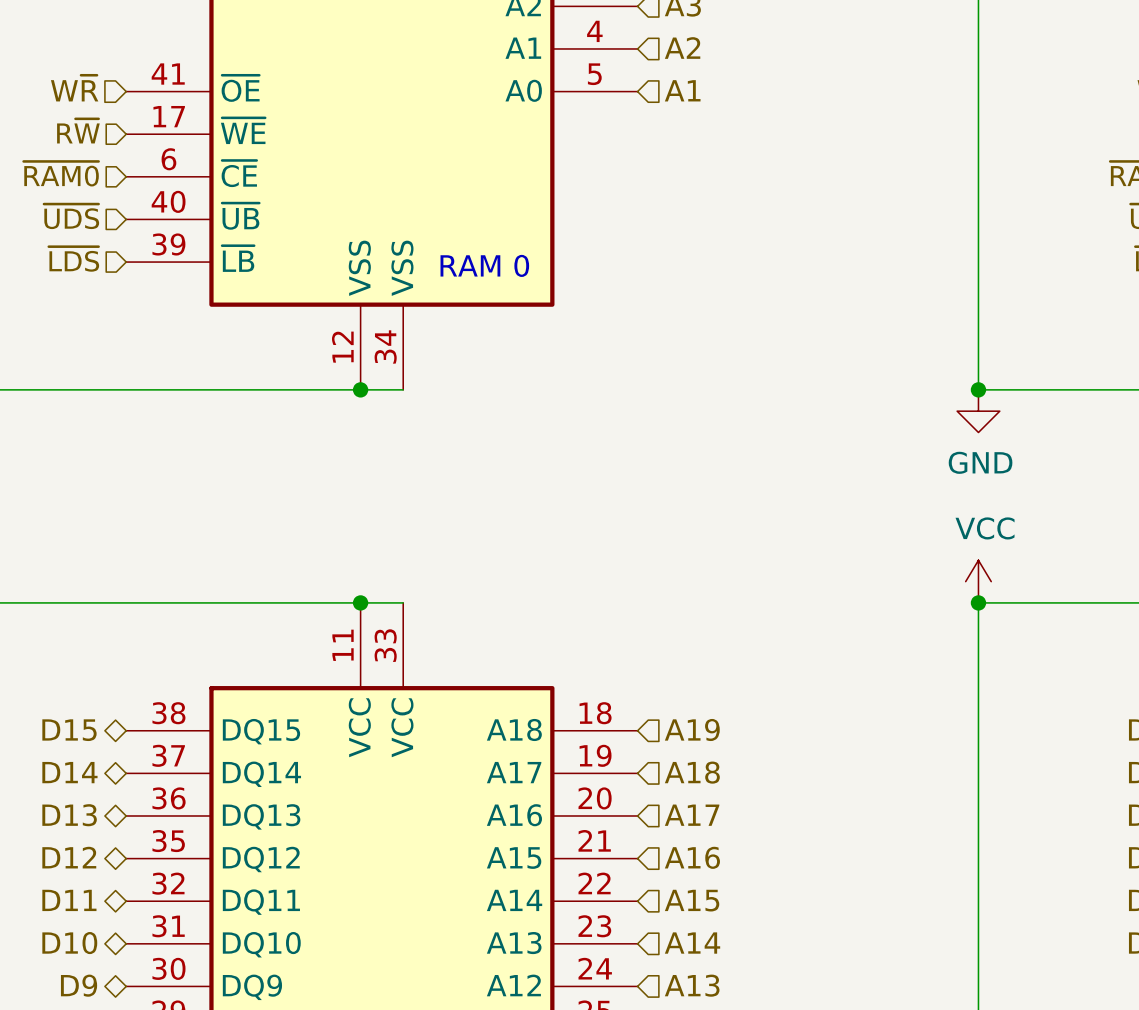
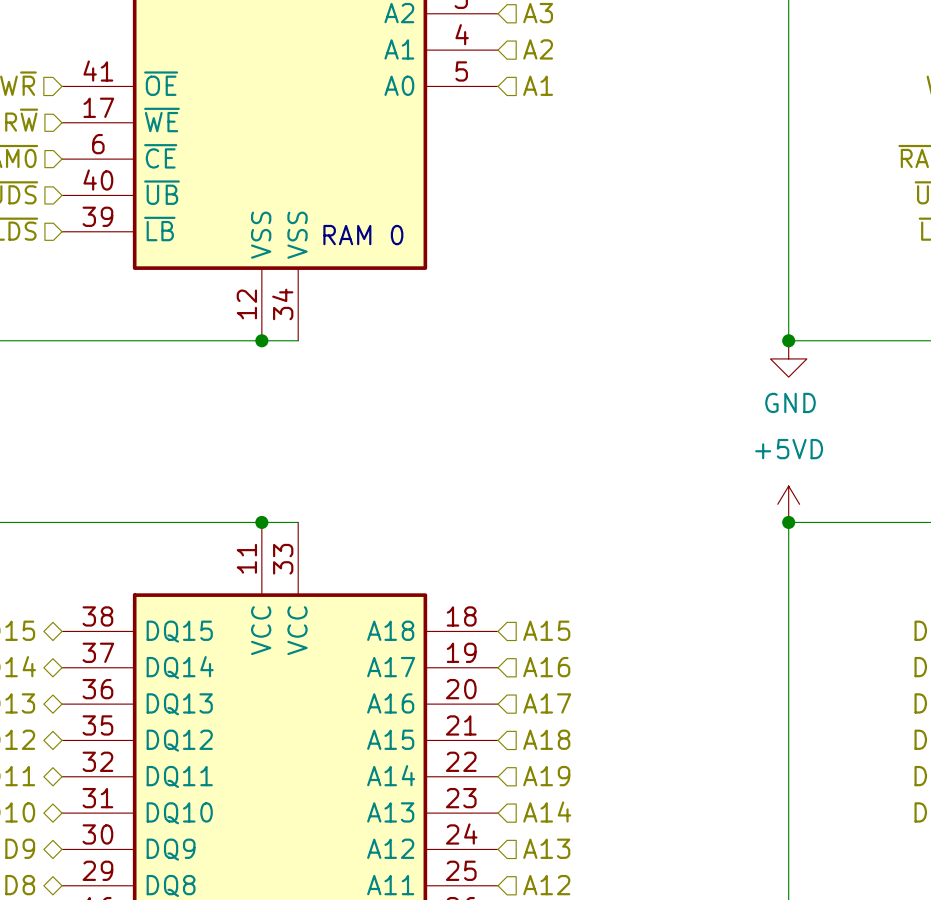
power symbol: VCC (978, 581) -> +5VD (788, 504)
hierarchical label: A19 (692, 729) -> A15 (546, 630)
hierarchical label: A18 (692, 772) -> A16 (546, 667)
hierarchical label: A16 (692, 857) -> A18 (546, 739)
hierarchical label: A15 (692, 900) -> A19 (546, 776)

